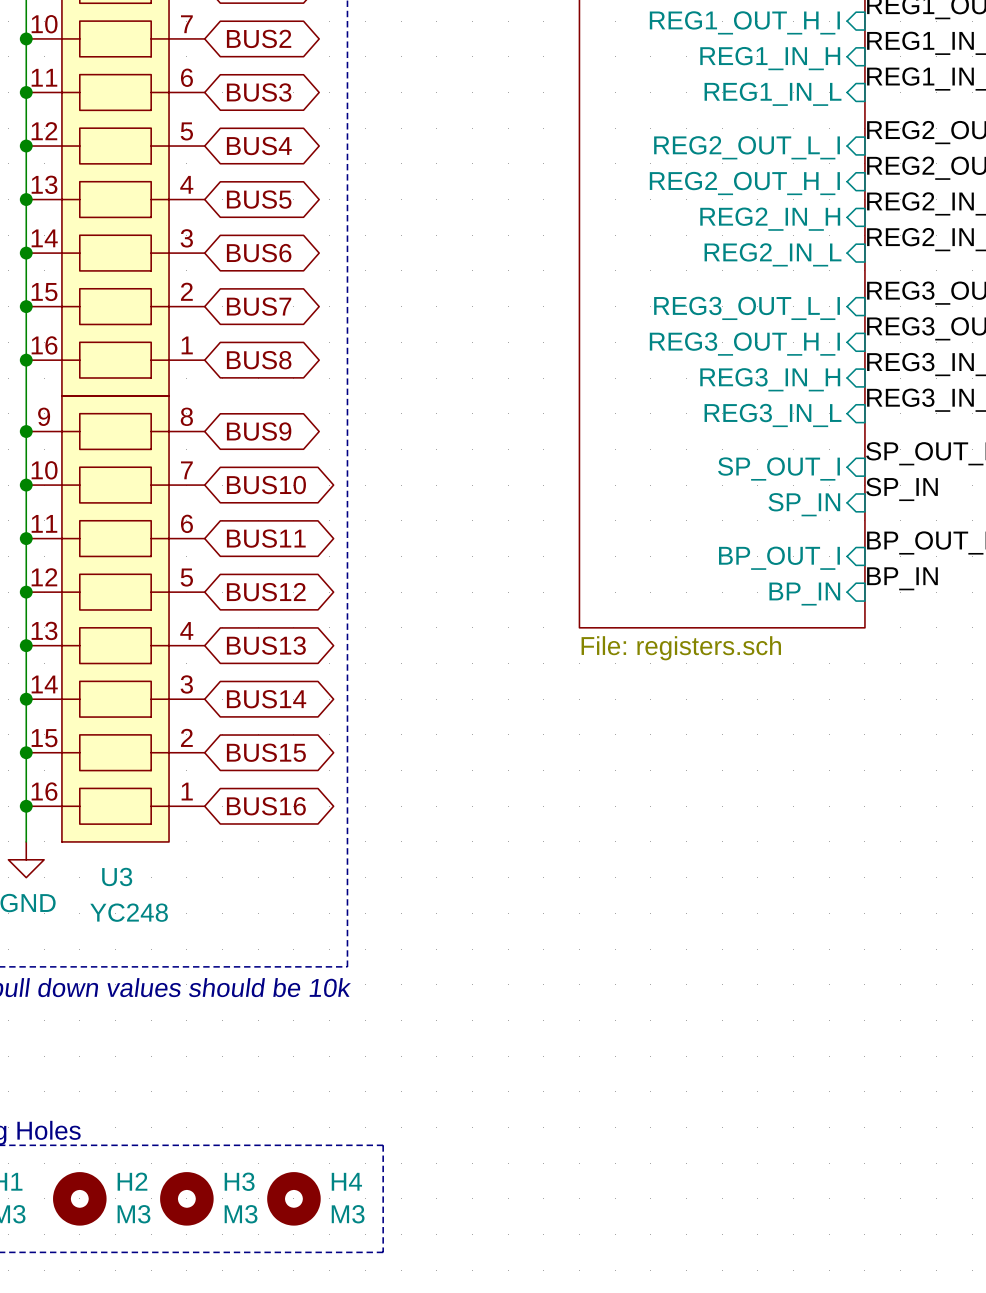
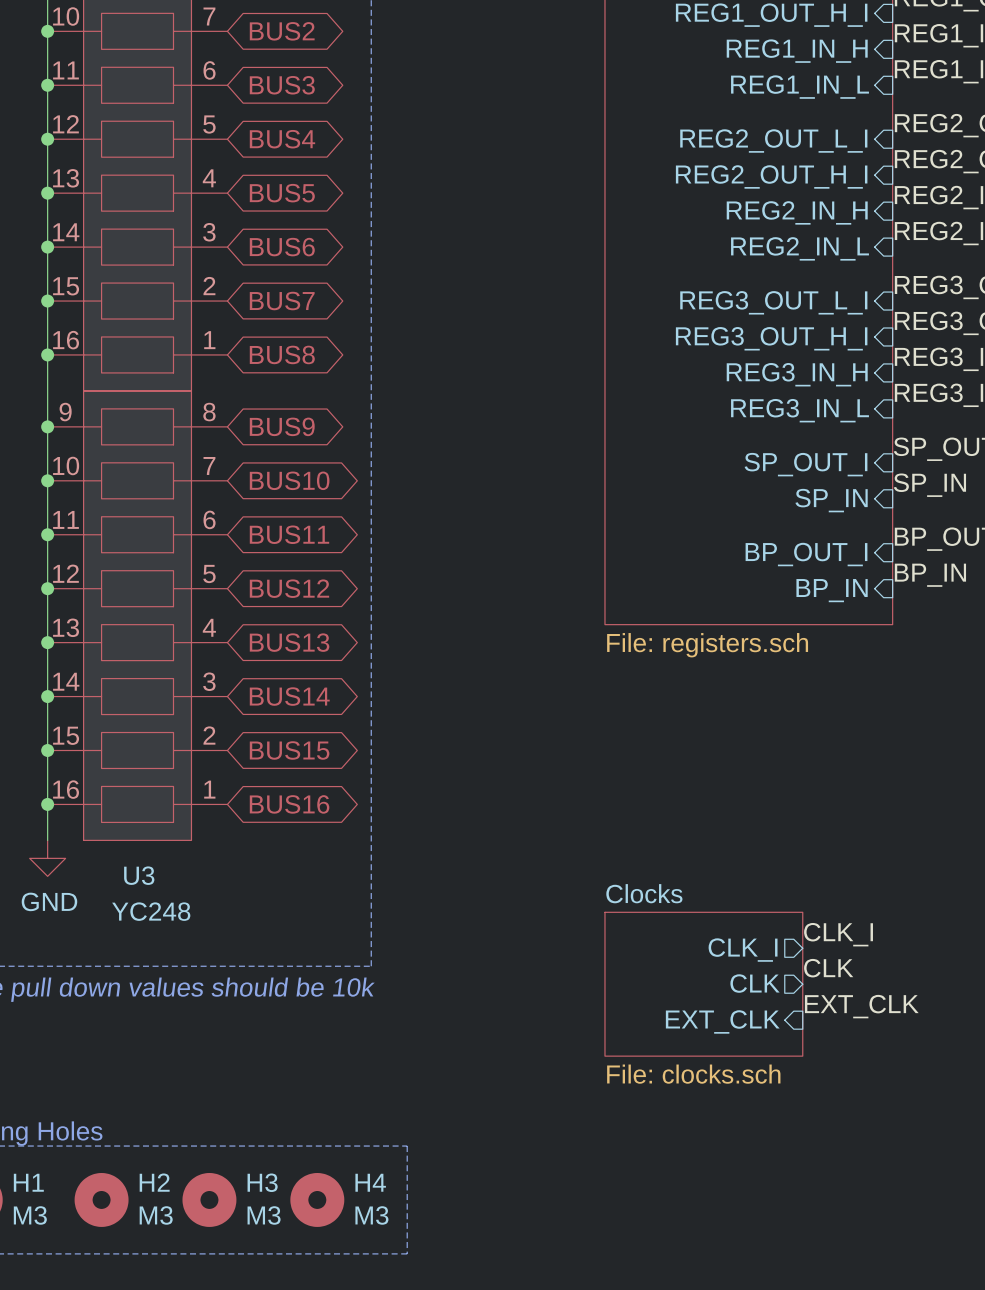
label: none -> CLK_I (838, 934)
sheet pin: none -> CLK_I (743, 950)
label: none -> CLK (828, 968)
sheet Clocks: none -> File: clocks.sch (703, 984)
sheet pin: none -> CLK (755, 983)
label: none -> EXT_CLK (861, 1006)
sheet pin: none -> EXT_CLK (722, 1021)

